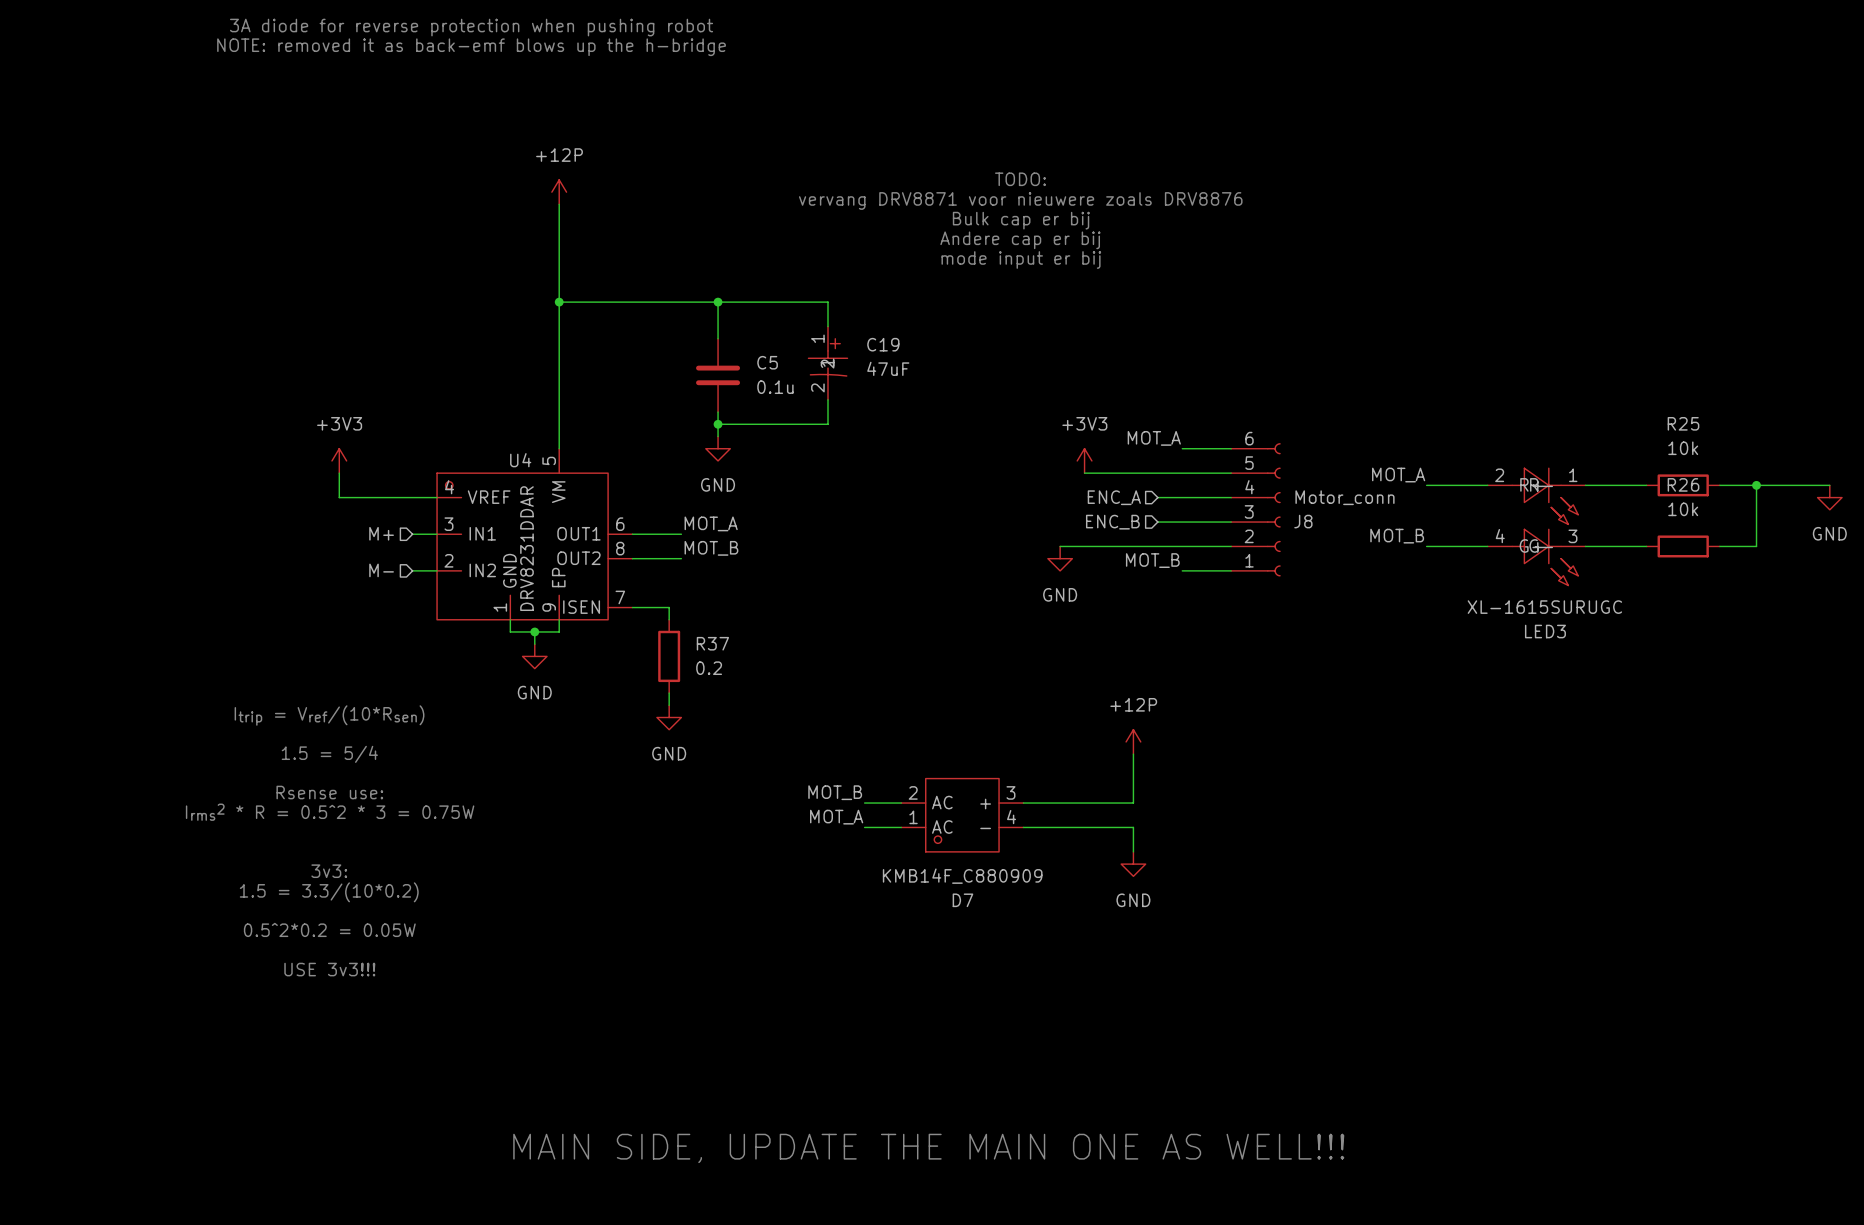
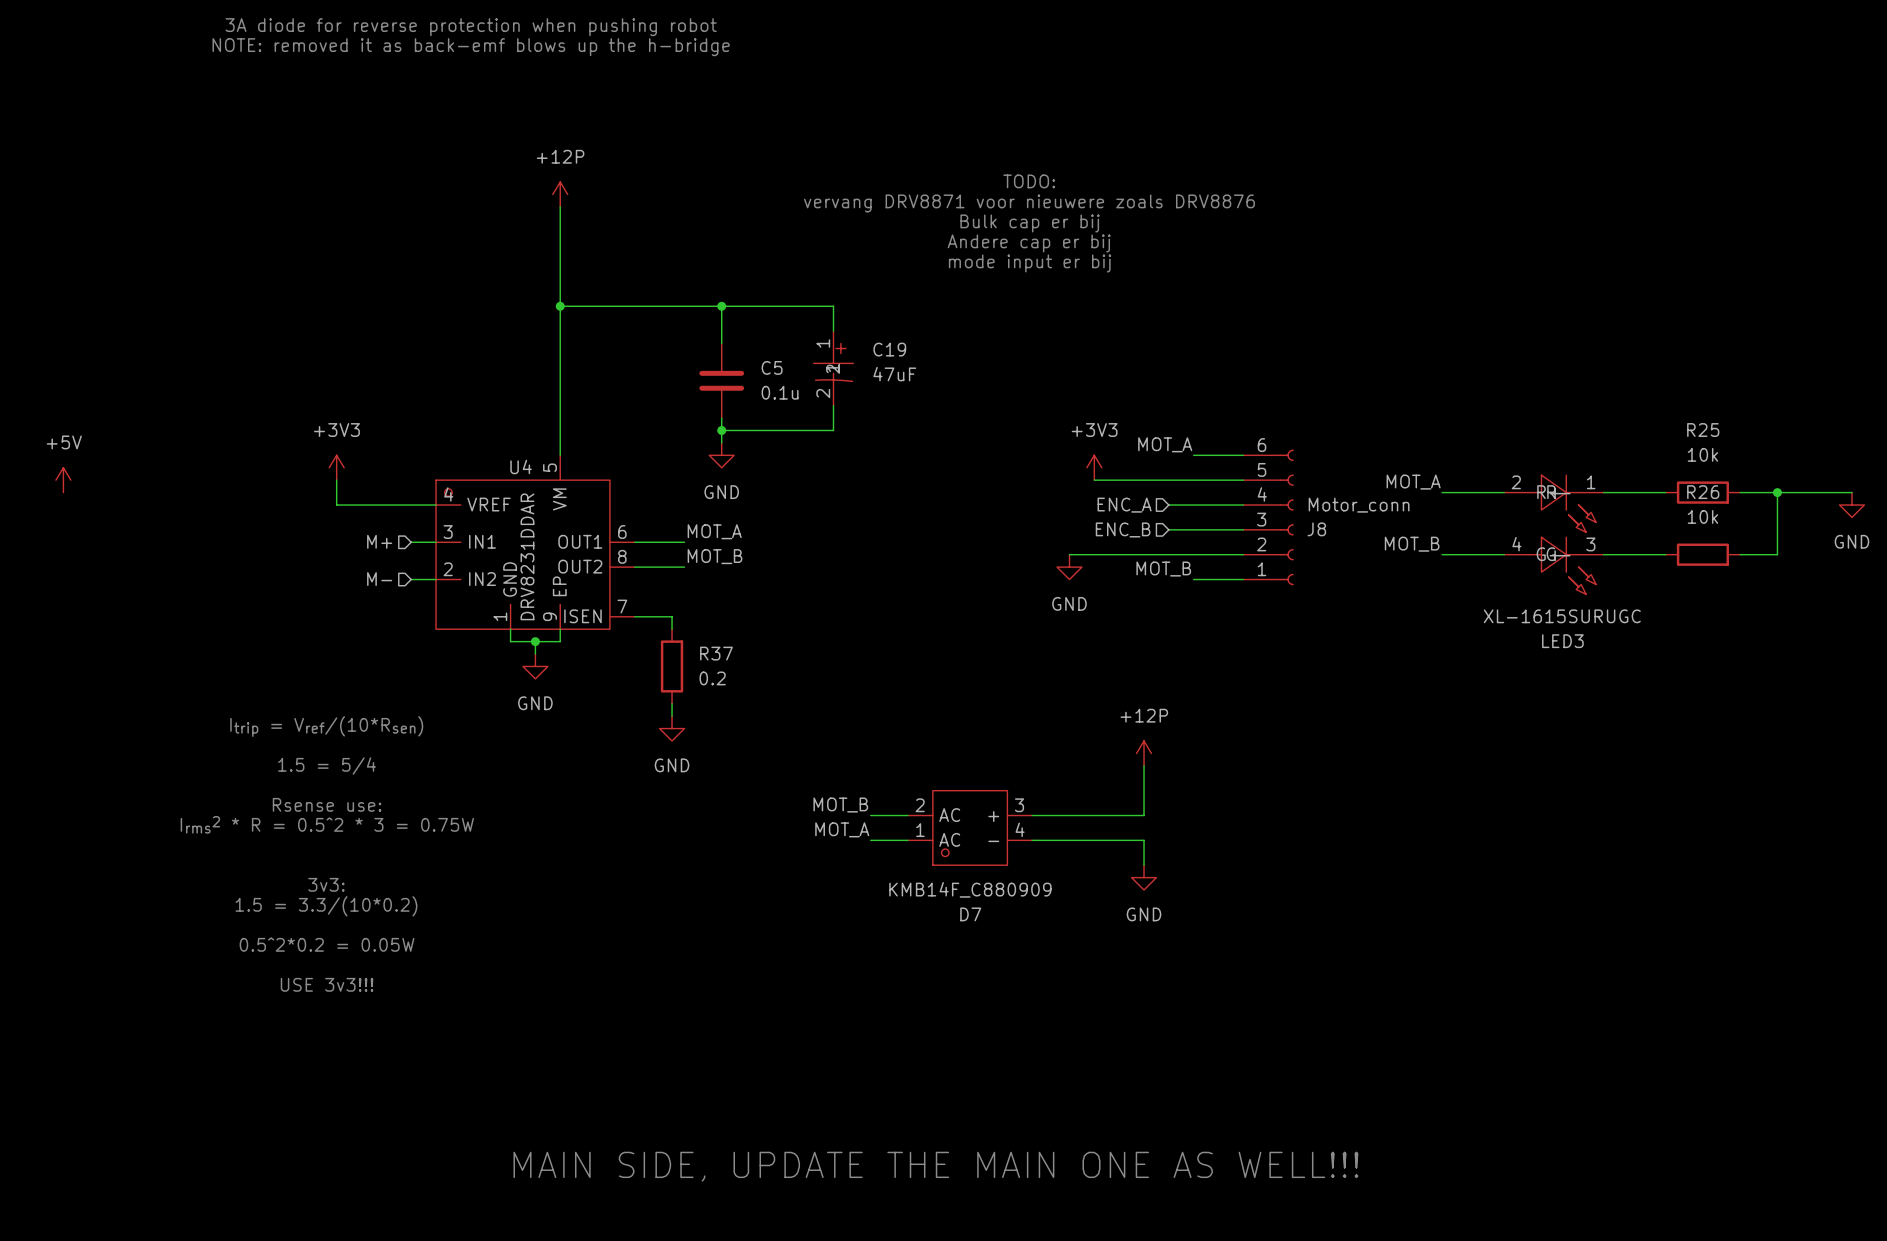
power symbol: none -> +5V (63, 480)

